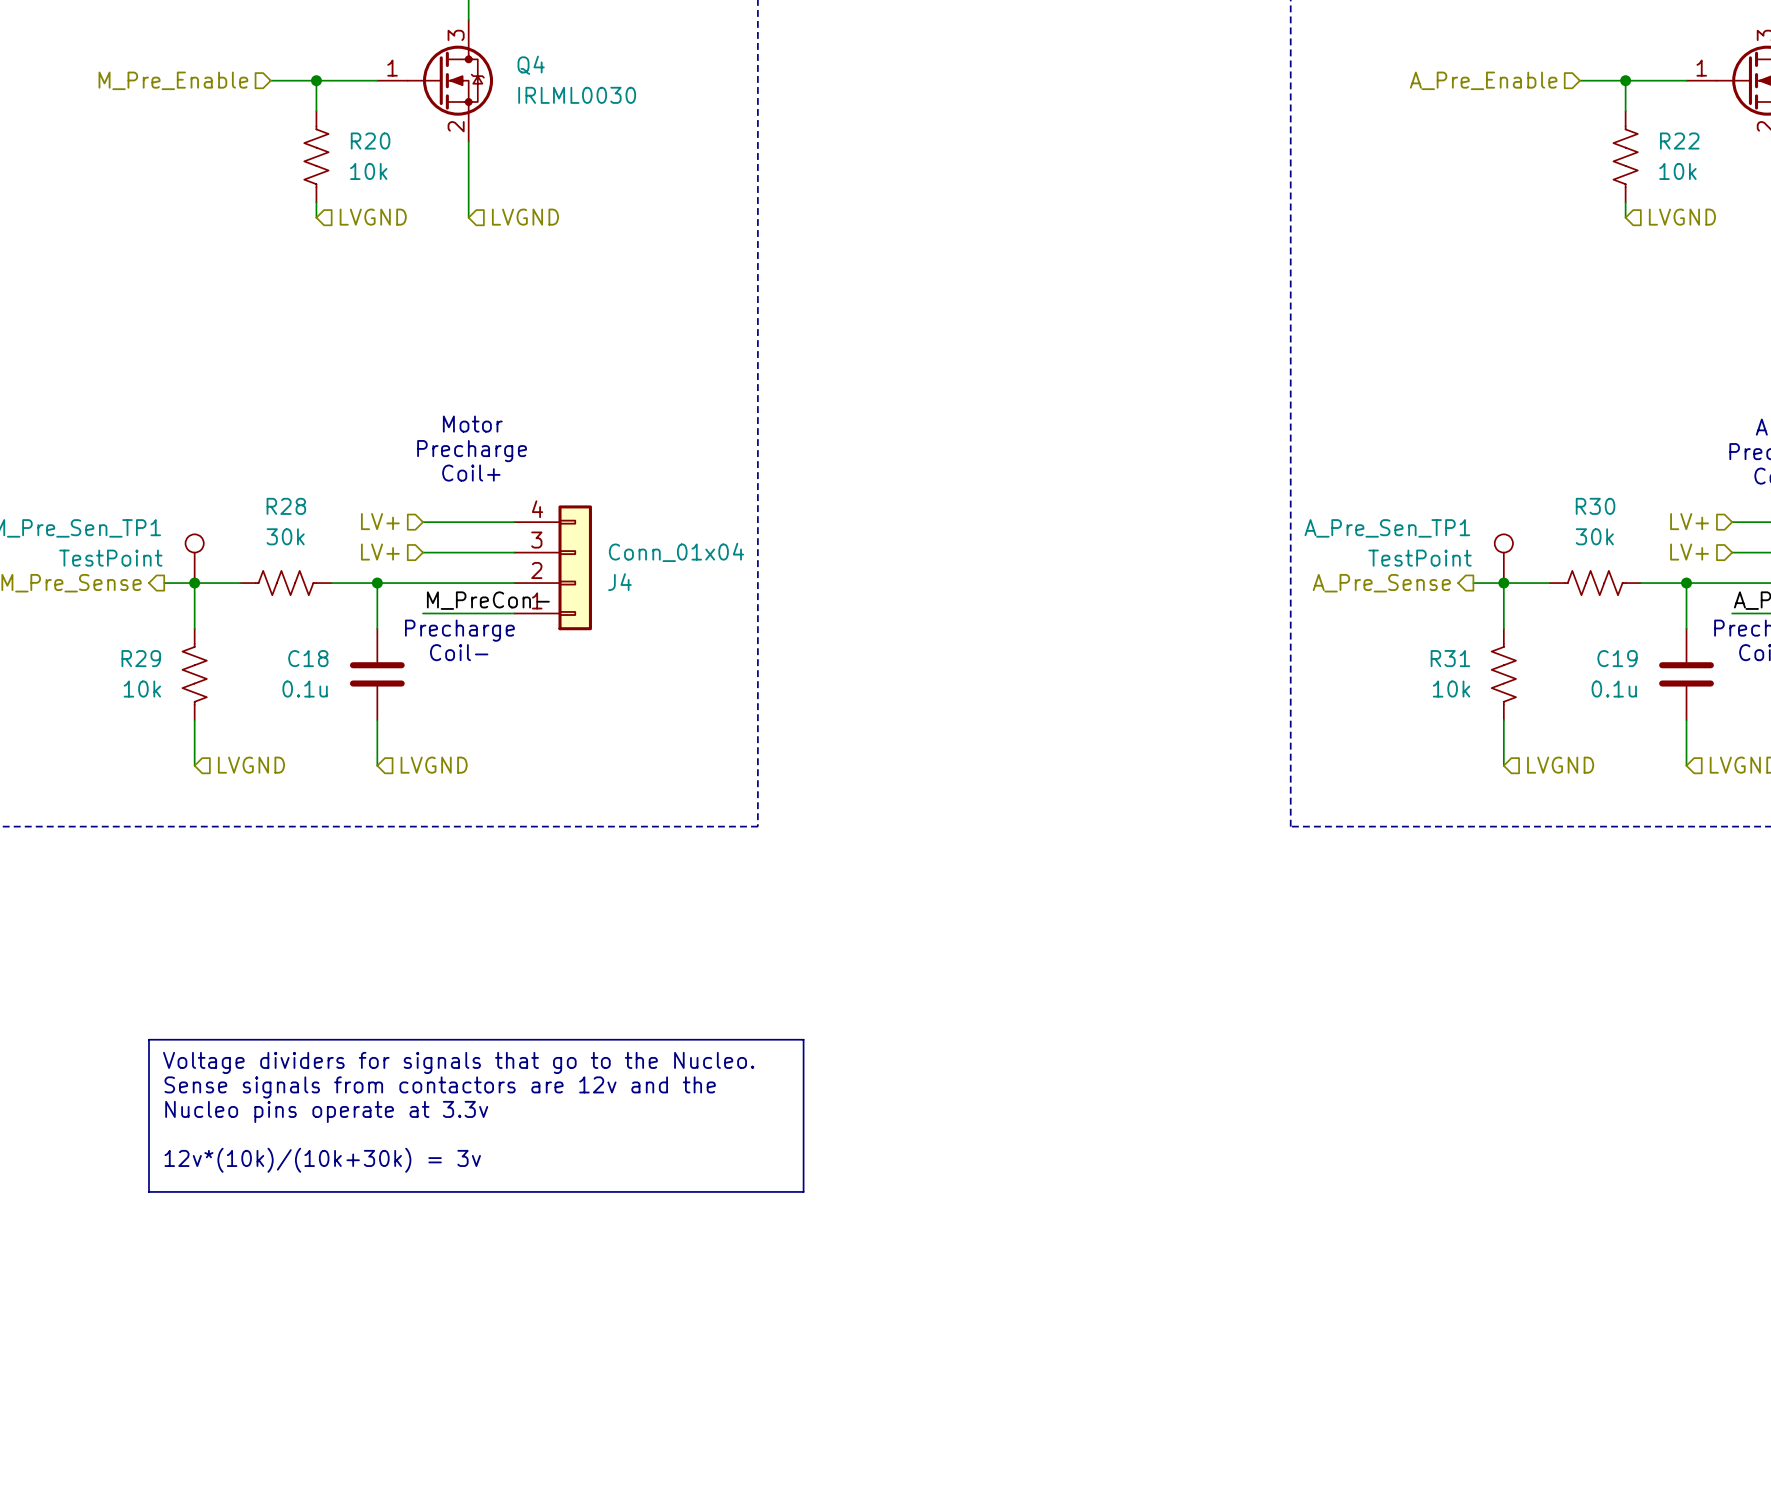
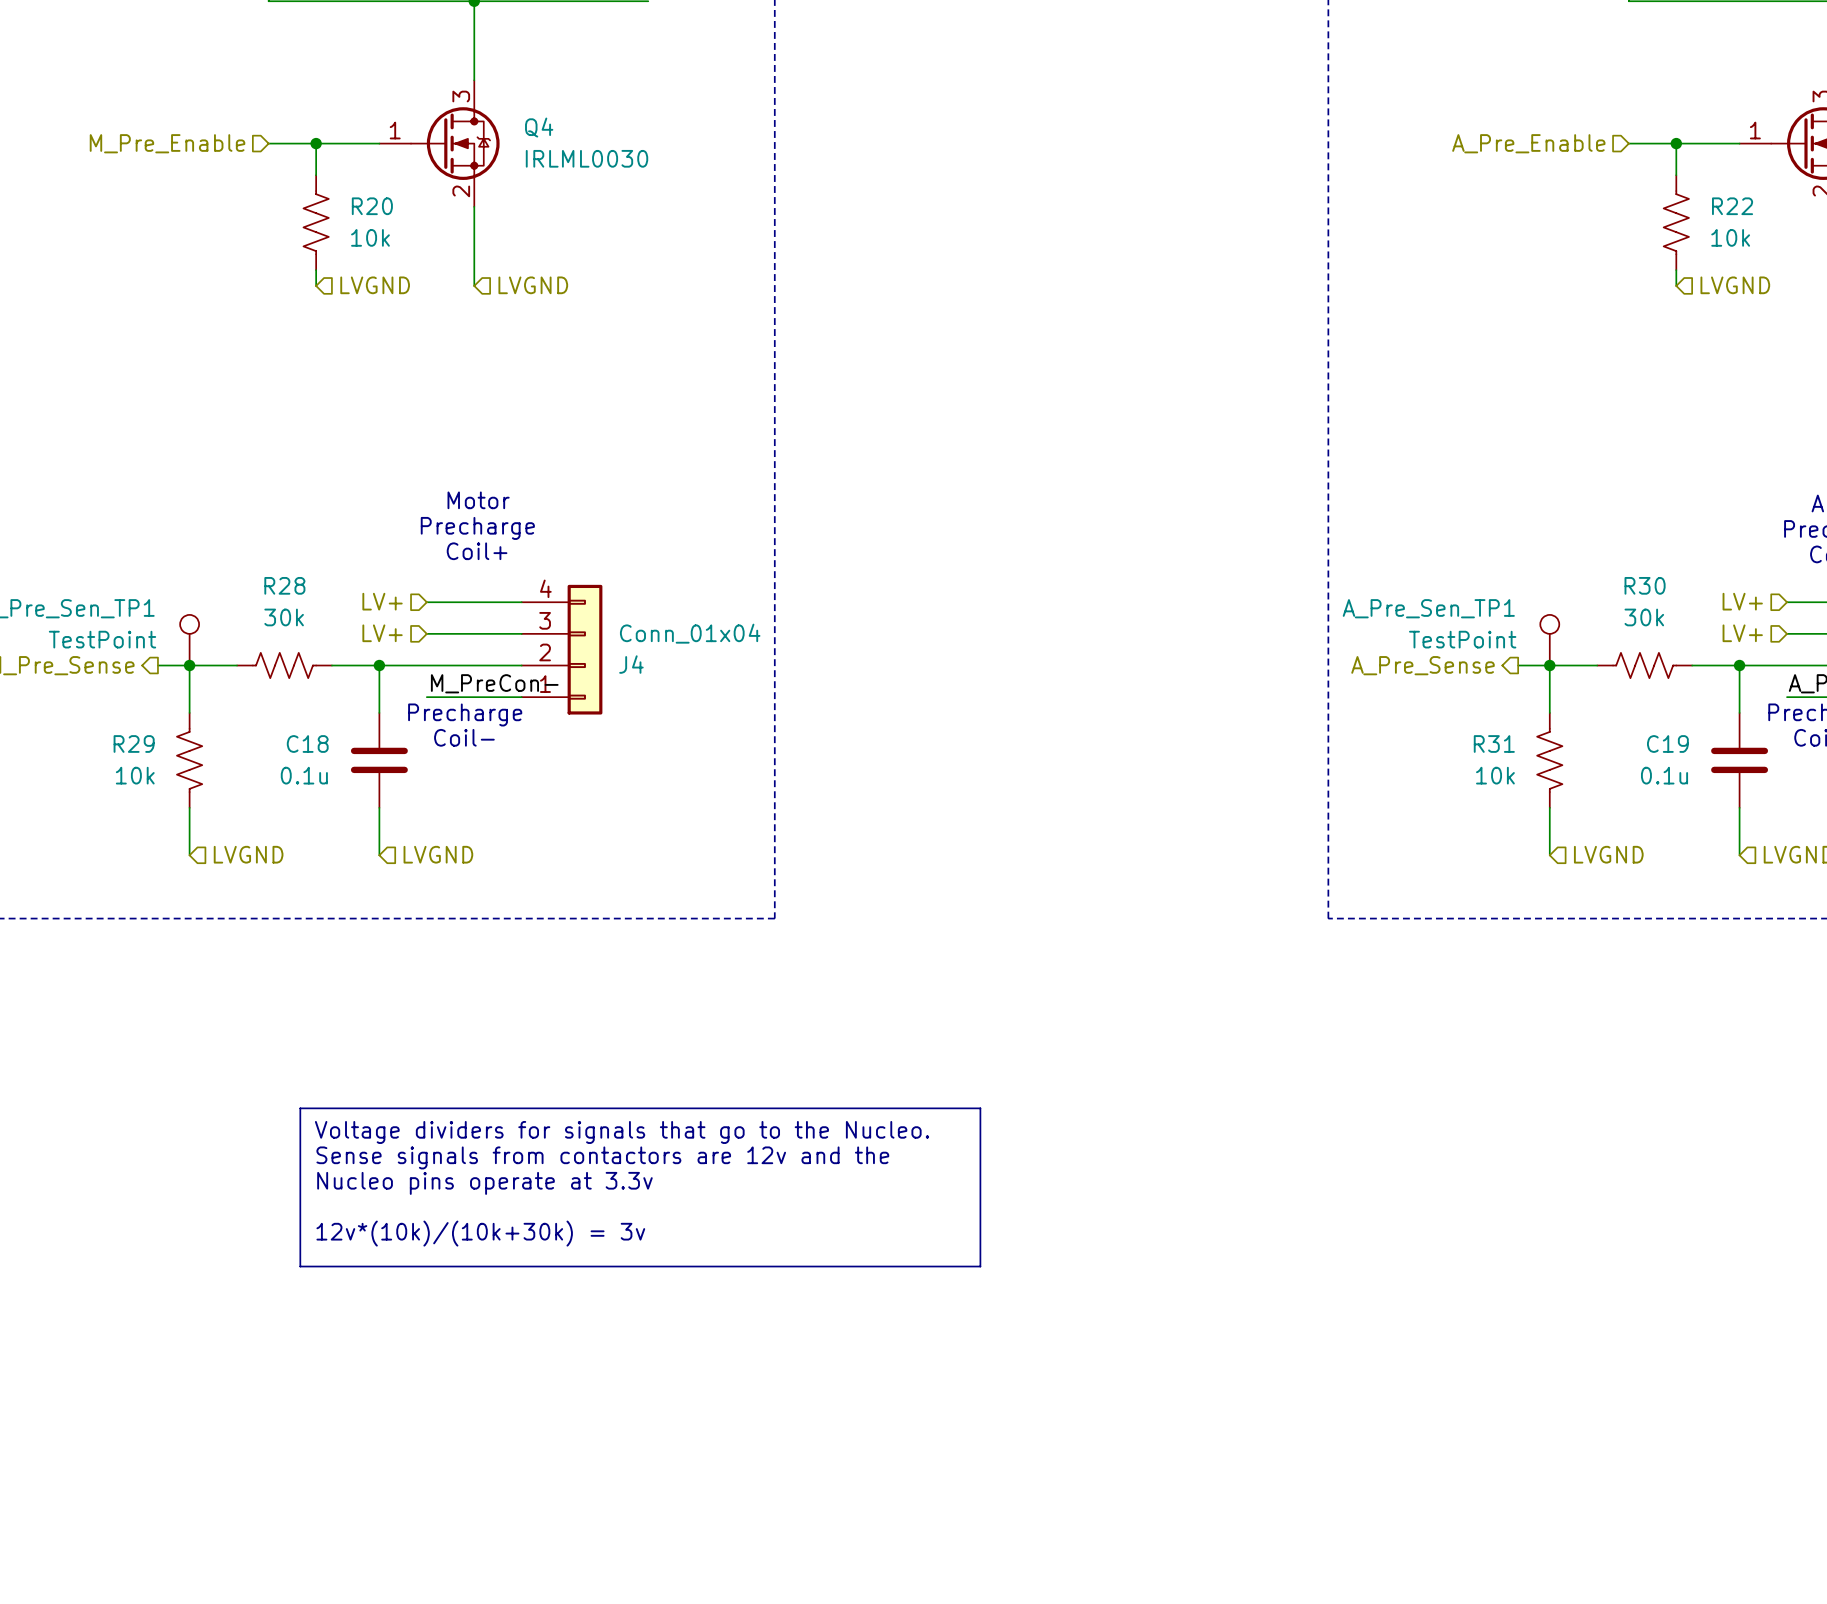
line: (148, 1039) (803, 1039) (803, 1191) (148, 1191) (148, 1039) -> (300, 1108) (980, 1108) (980, 1266) (300, 1266) (300, 1108)
text position: Voltage dividers for signals that go to the Nucleo. (458, 1062) -> Voltage dividers for signals that go to the Nucleo. (622, 1132)
text position: Sense signals from contactors are 12v and the (440, 1087) -> Sense signals from contactors are 12v and the (602, 1157)
text position: Nucleo pins operate at 3.3v (326, 1111) -> Nucleo pins operate at 3.3v (484, 1183)
text position: 12v*(10k)/(10k+30k) = 3v (322, 1160) -> 12v*(10k)/(10k+30k) = 3v (480, 1233)

